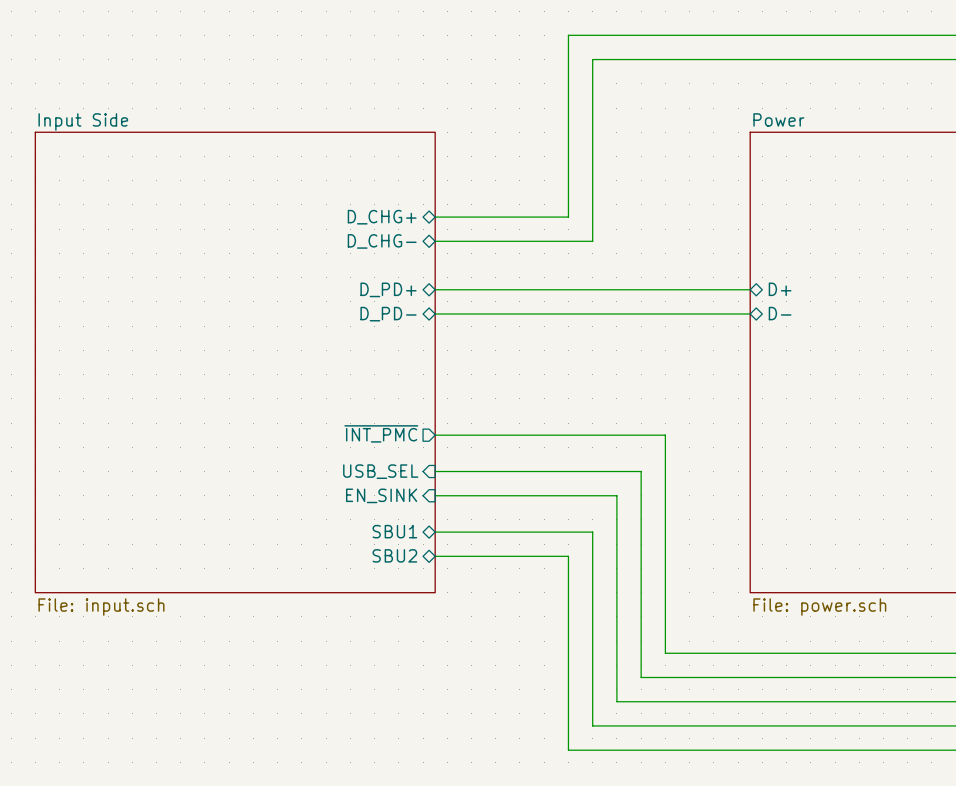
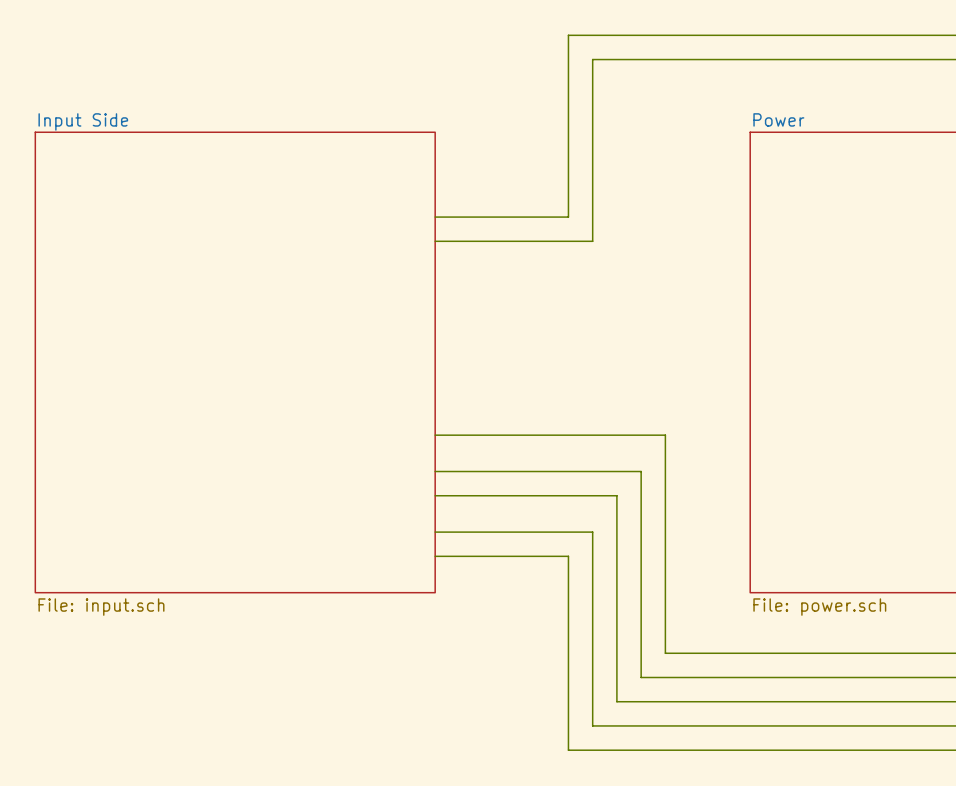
sheet pin: D_CHG+ (382, 217) -> none
sheet pin: D_CHG- (382, 241) -> none
sheet pin: D_PD+ (388, 289) -> none
wire: (435, 289) (750, 289) -> none
sheet pin: D+ (780, 289) -> none
sheet pin: D- (780, 313) -> none
sheet pin: D_PD- (388, 314) -> none
wire: (435, 314) (750, 314) -> none
sheet pin: ~{INT_PMC} (381, 433) -> none
sheet pin: USB_SEL (380, 471) -> none
sheet pin: EN_SINK (381, 495) -> none
sheet pin: SBU1 (394, 531) -> none
sheet pin: SBU2 (394, 555) -> none

